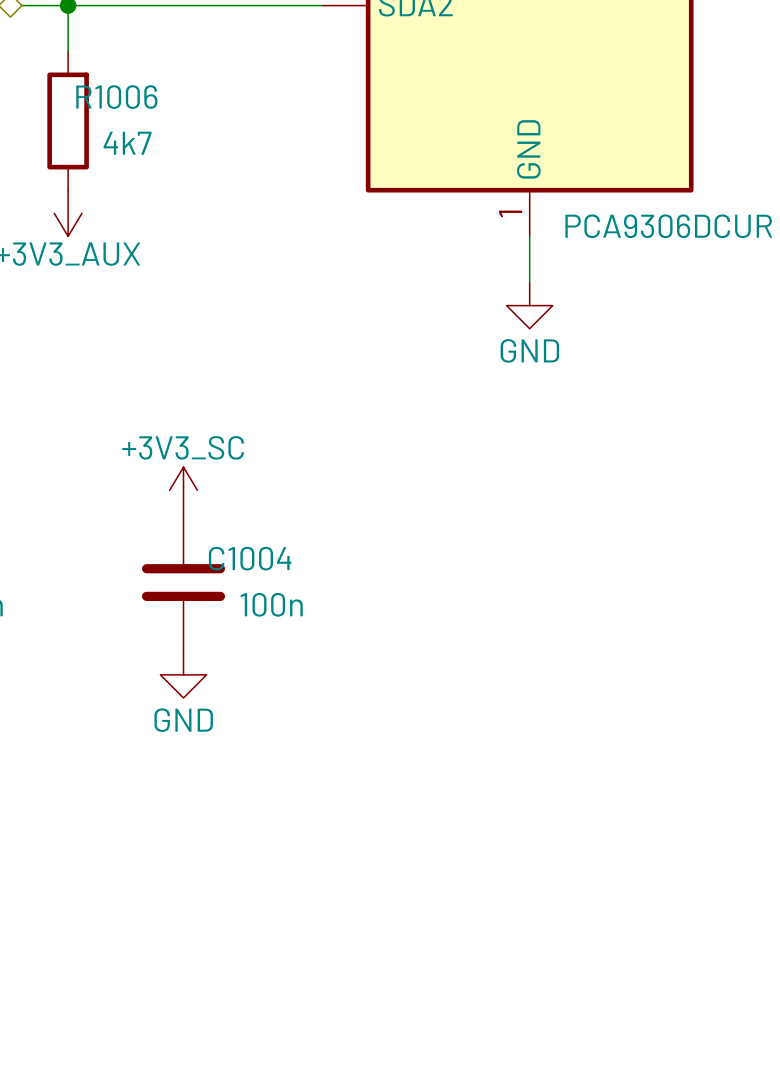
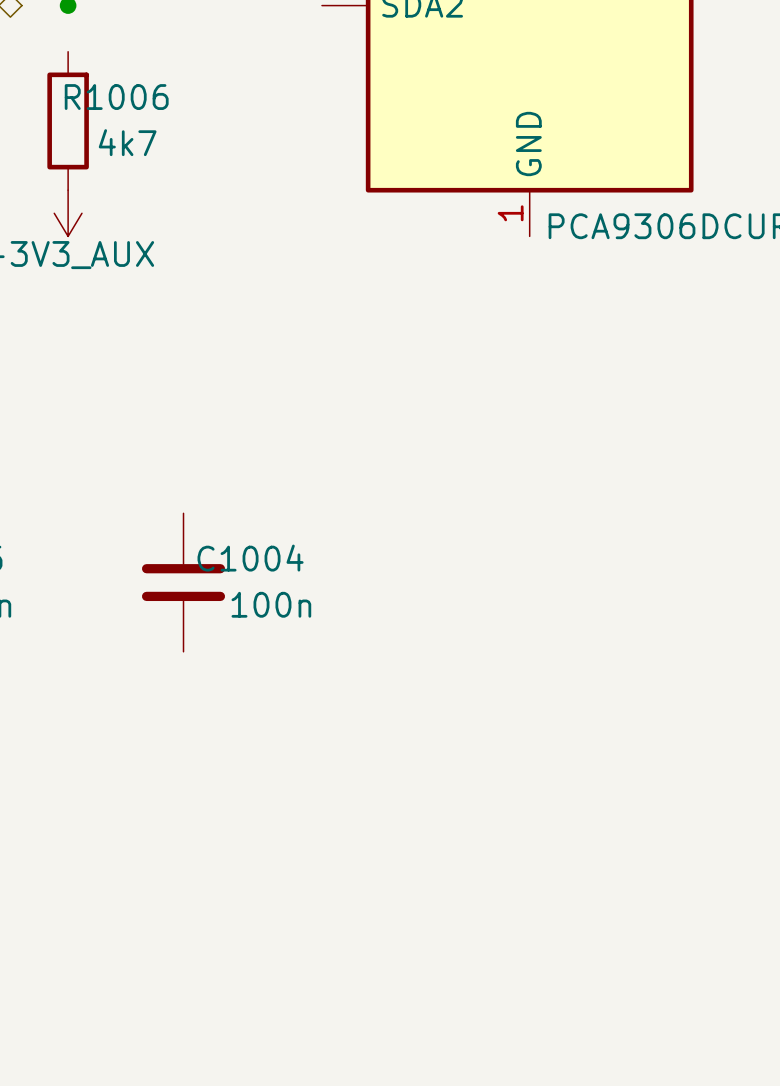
wire: (21, 5) (321, 5) -> none
wire: (68, 5) (68, 51) -> none
wire: (529, 236) (529, 282) -> none
power symbol: GND (529, 305) -> none
power symbol: +3V3_SC (183, 490) -> none
power symbol: GND (183, 674) -> none

